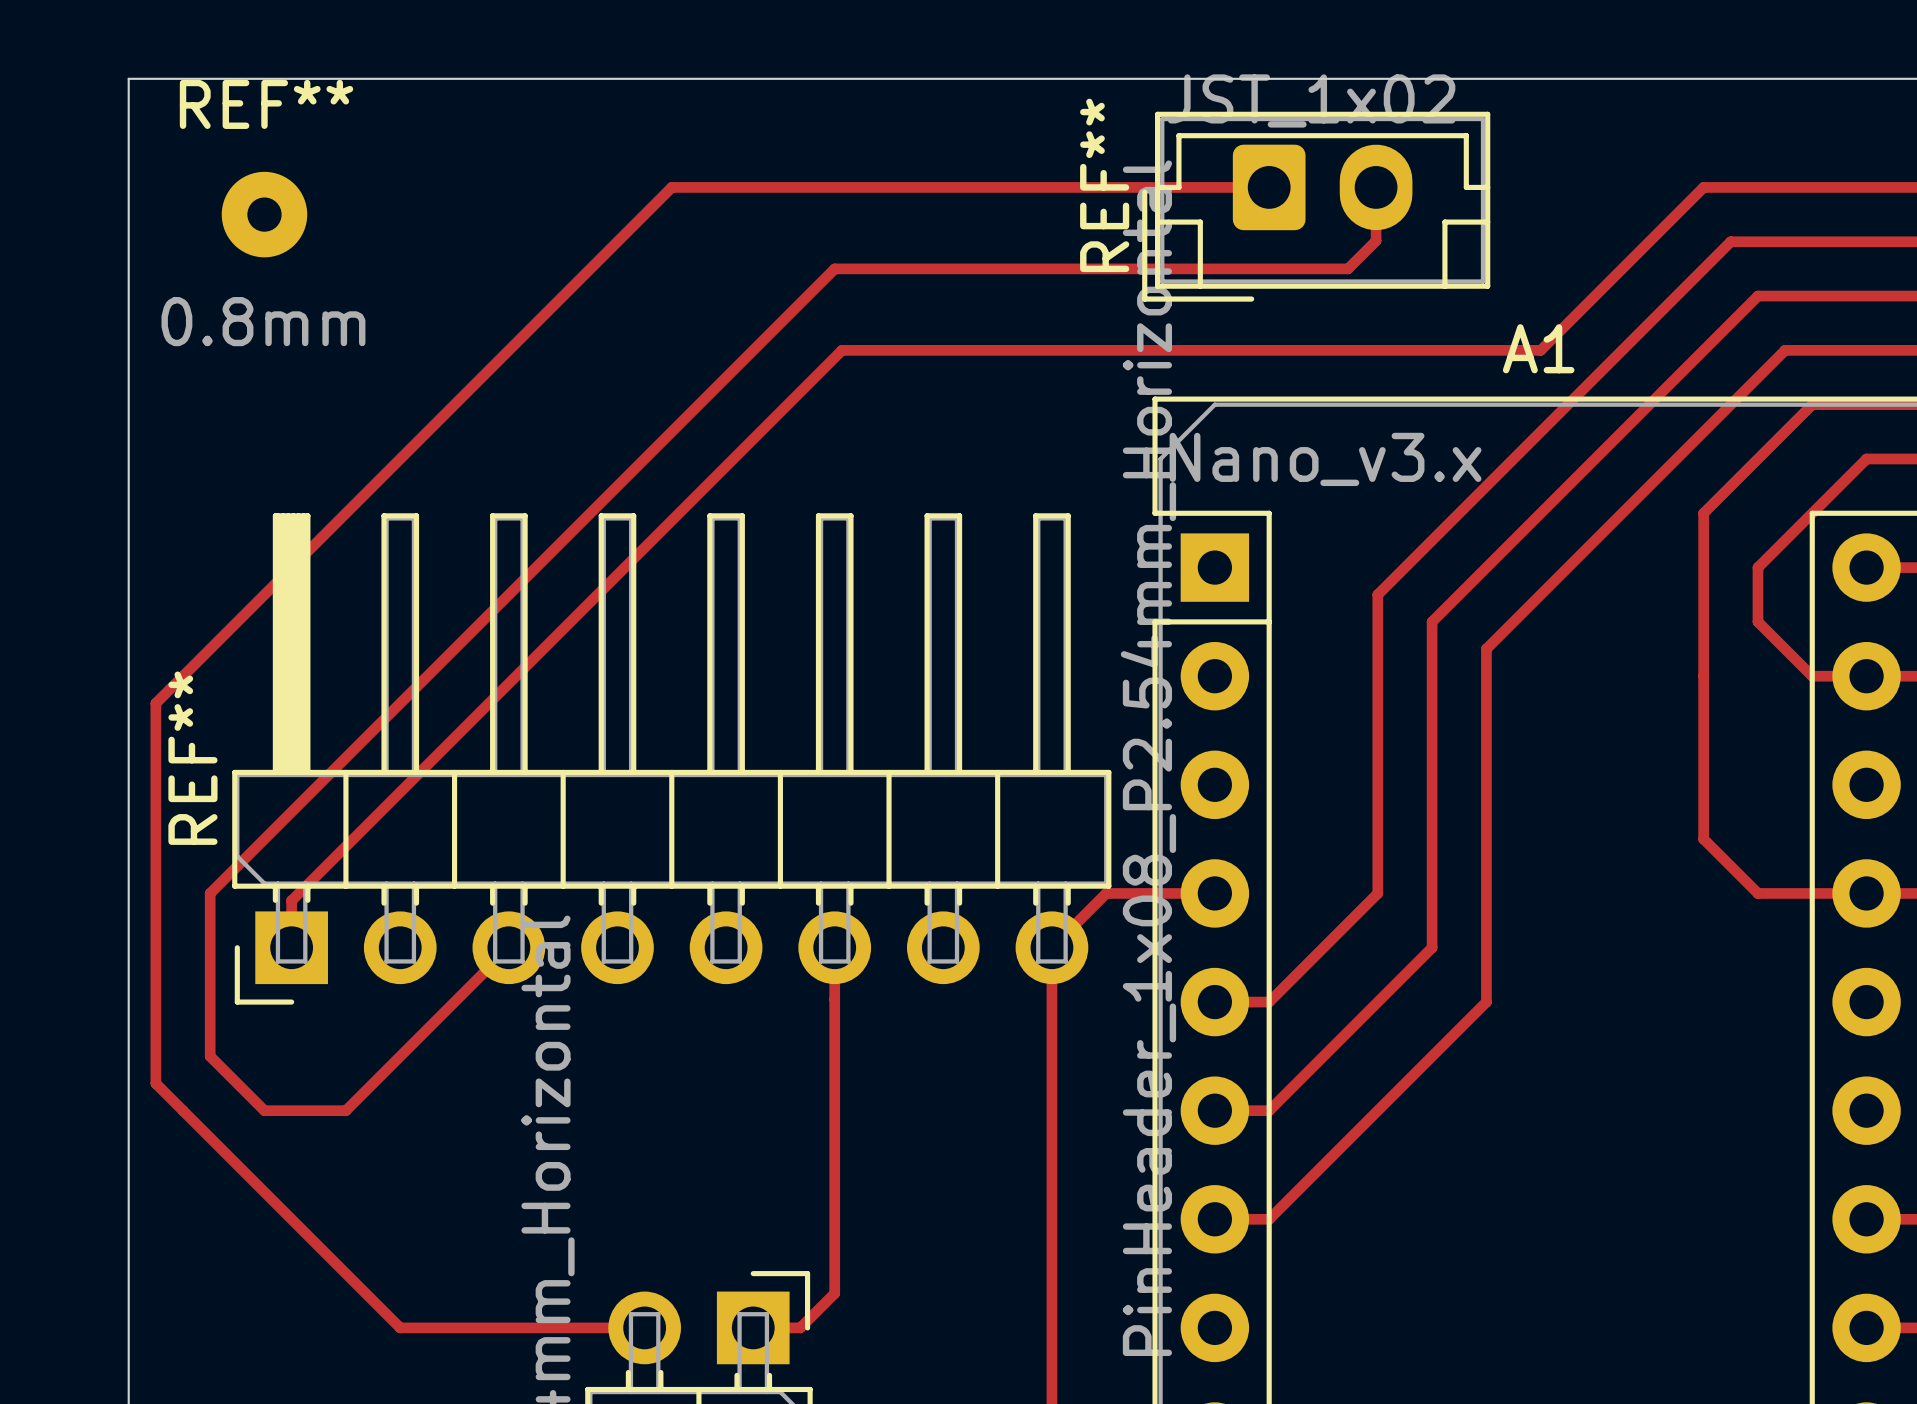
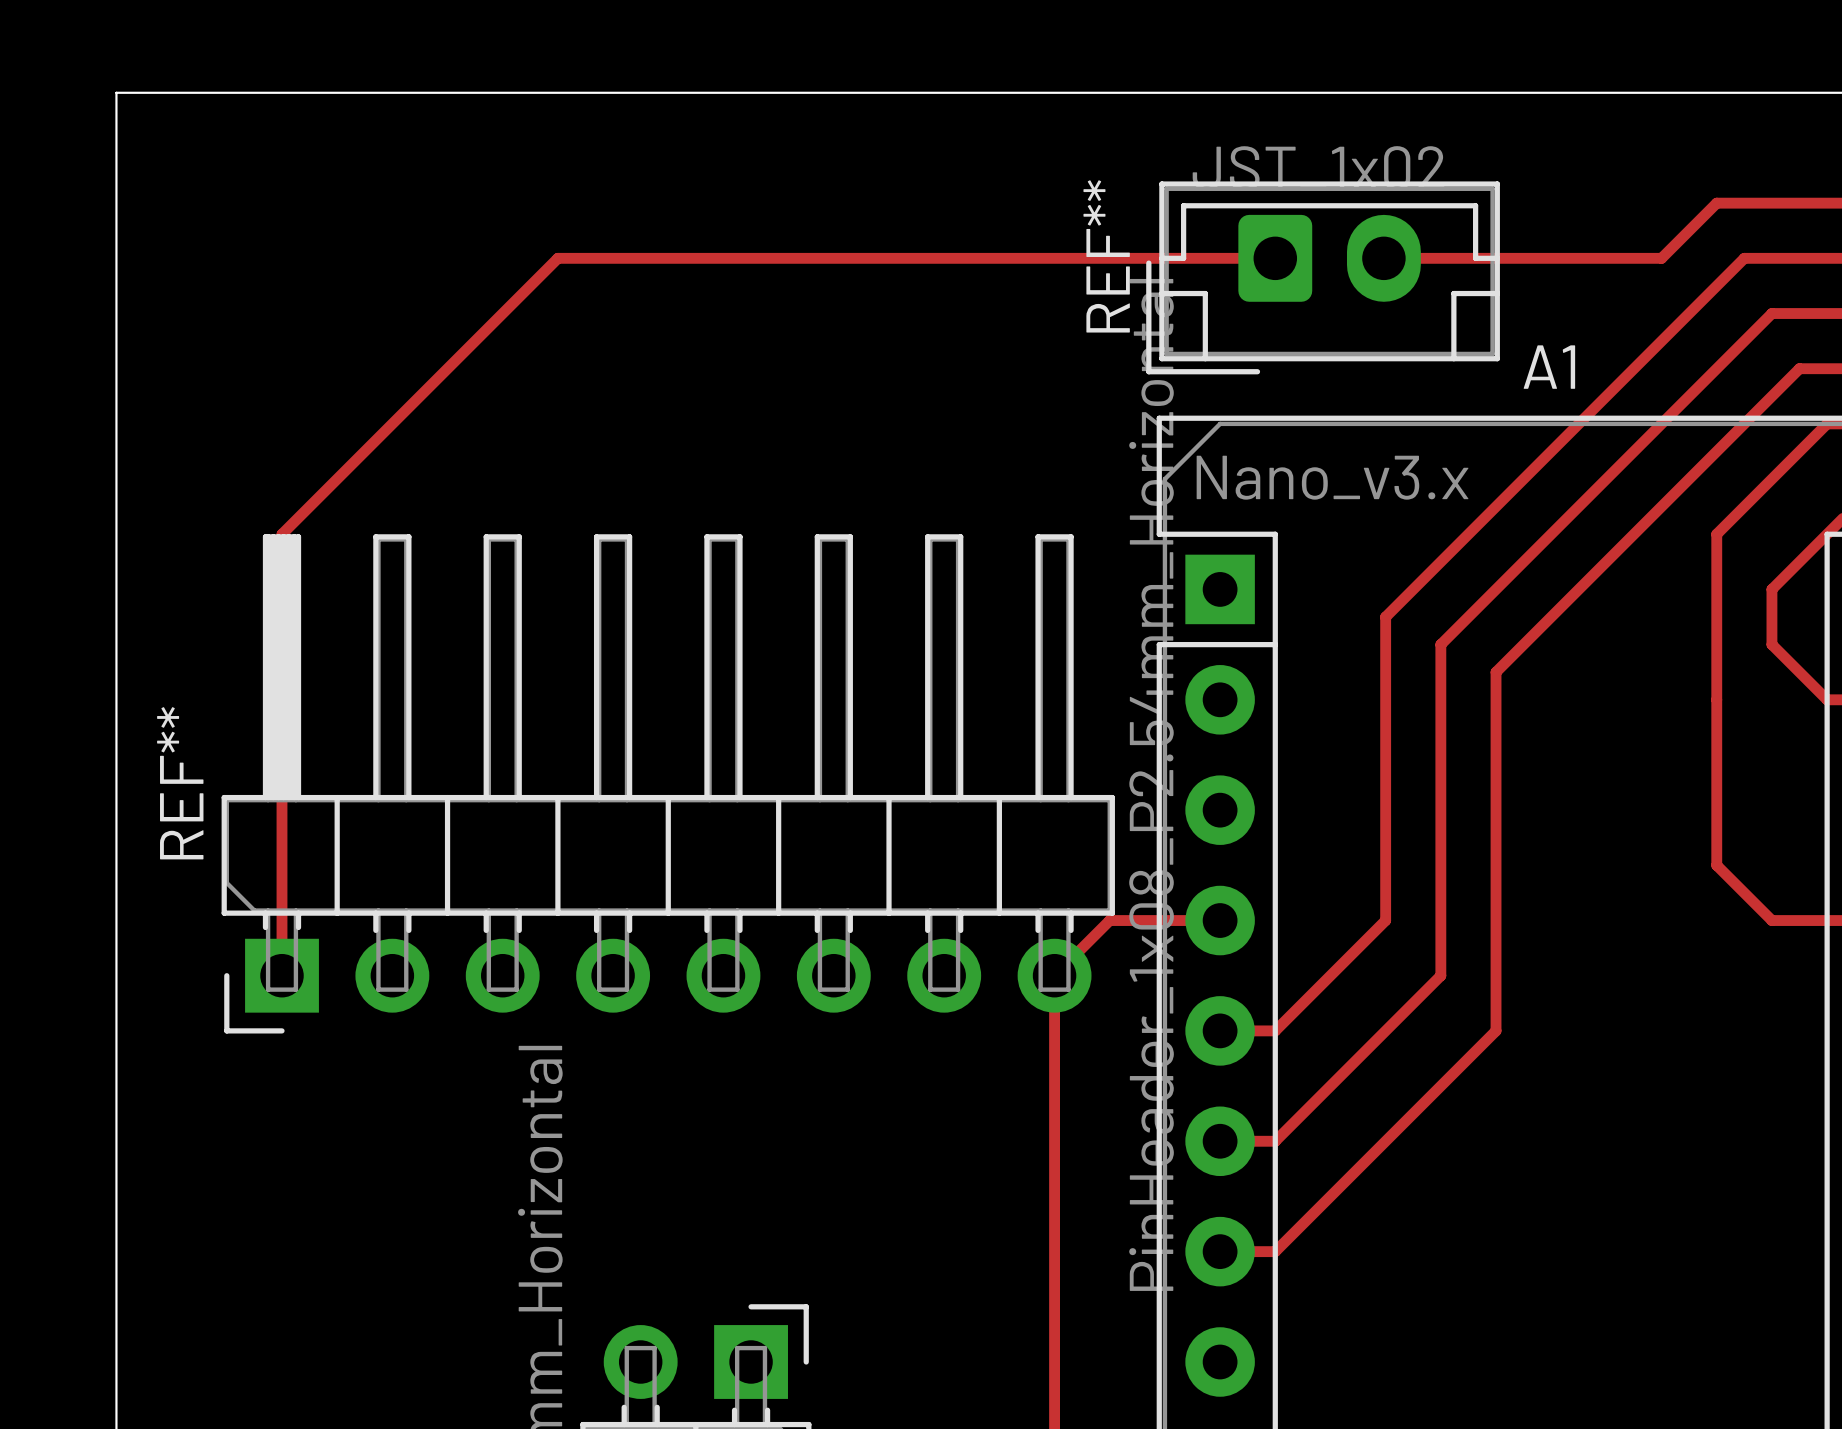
track: (1269, 187) (671, 187) (155, 703) (155, 1083) (400, 1327) (644, 1327) -> none
track: (1376, 187) (1376, 240) (1348, 268) (834, 268) (210, 893) (210, 1056) (264, 1110) (345, 1110) (508, 947) -> none
REF** position: (1316, 206) -> (1323, 277)
REF**: 0.8mm (264, 214) -> none
track: none -> (1383, 258) (1661, 258)
track: (1649, 241) (1540, 350) (841, 350) (291, 900) -> (1275, 258) (557, 258) (282, 534) (282, 927)
track: (834, 947) (834, 1293) (800, 1327) (753, 1327) -> none

